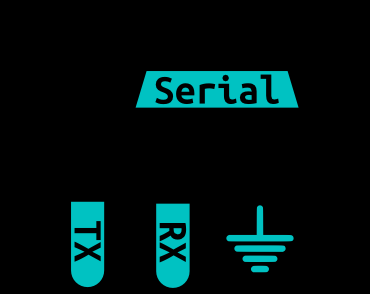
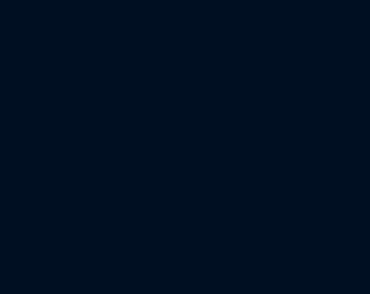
drawing: [135, 71, 299, 108] -> none
drawing: [71, 201, 105, 288] -> none
drawing: [156, 203, 294, 288] -> none

